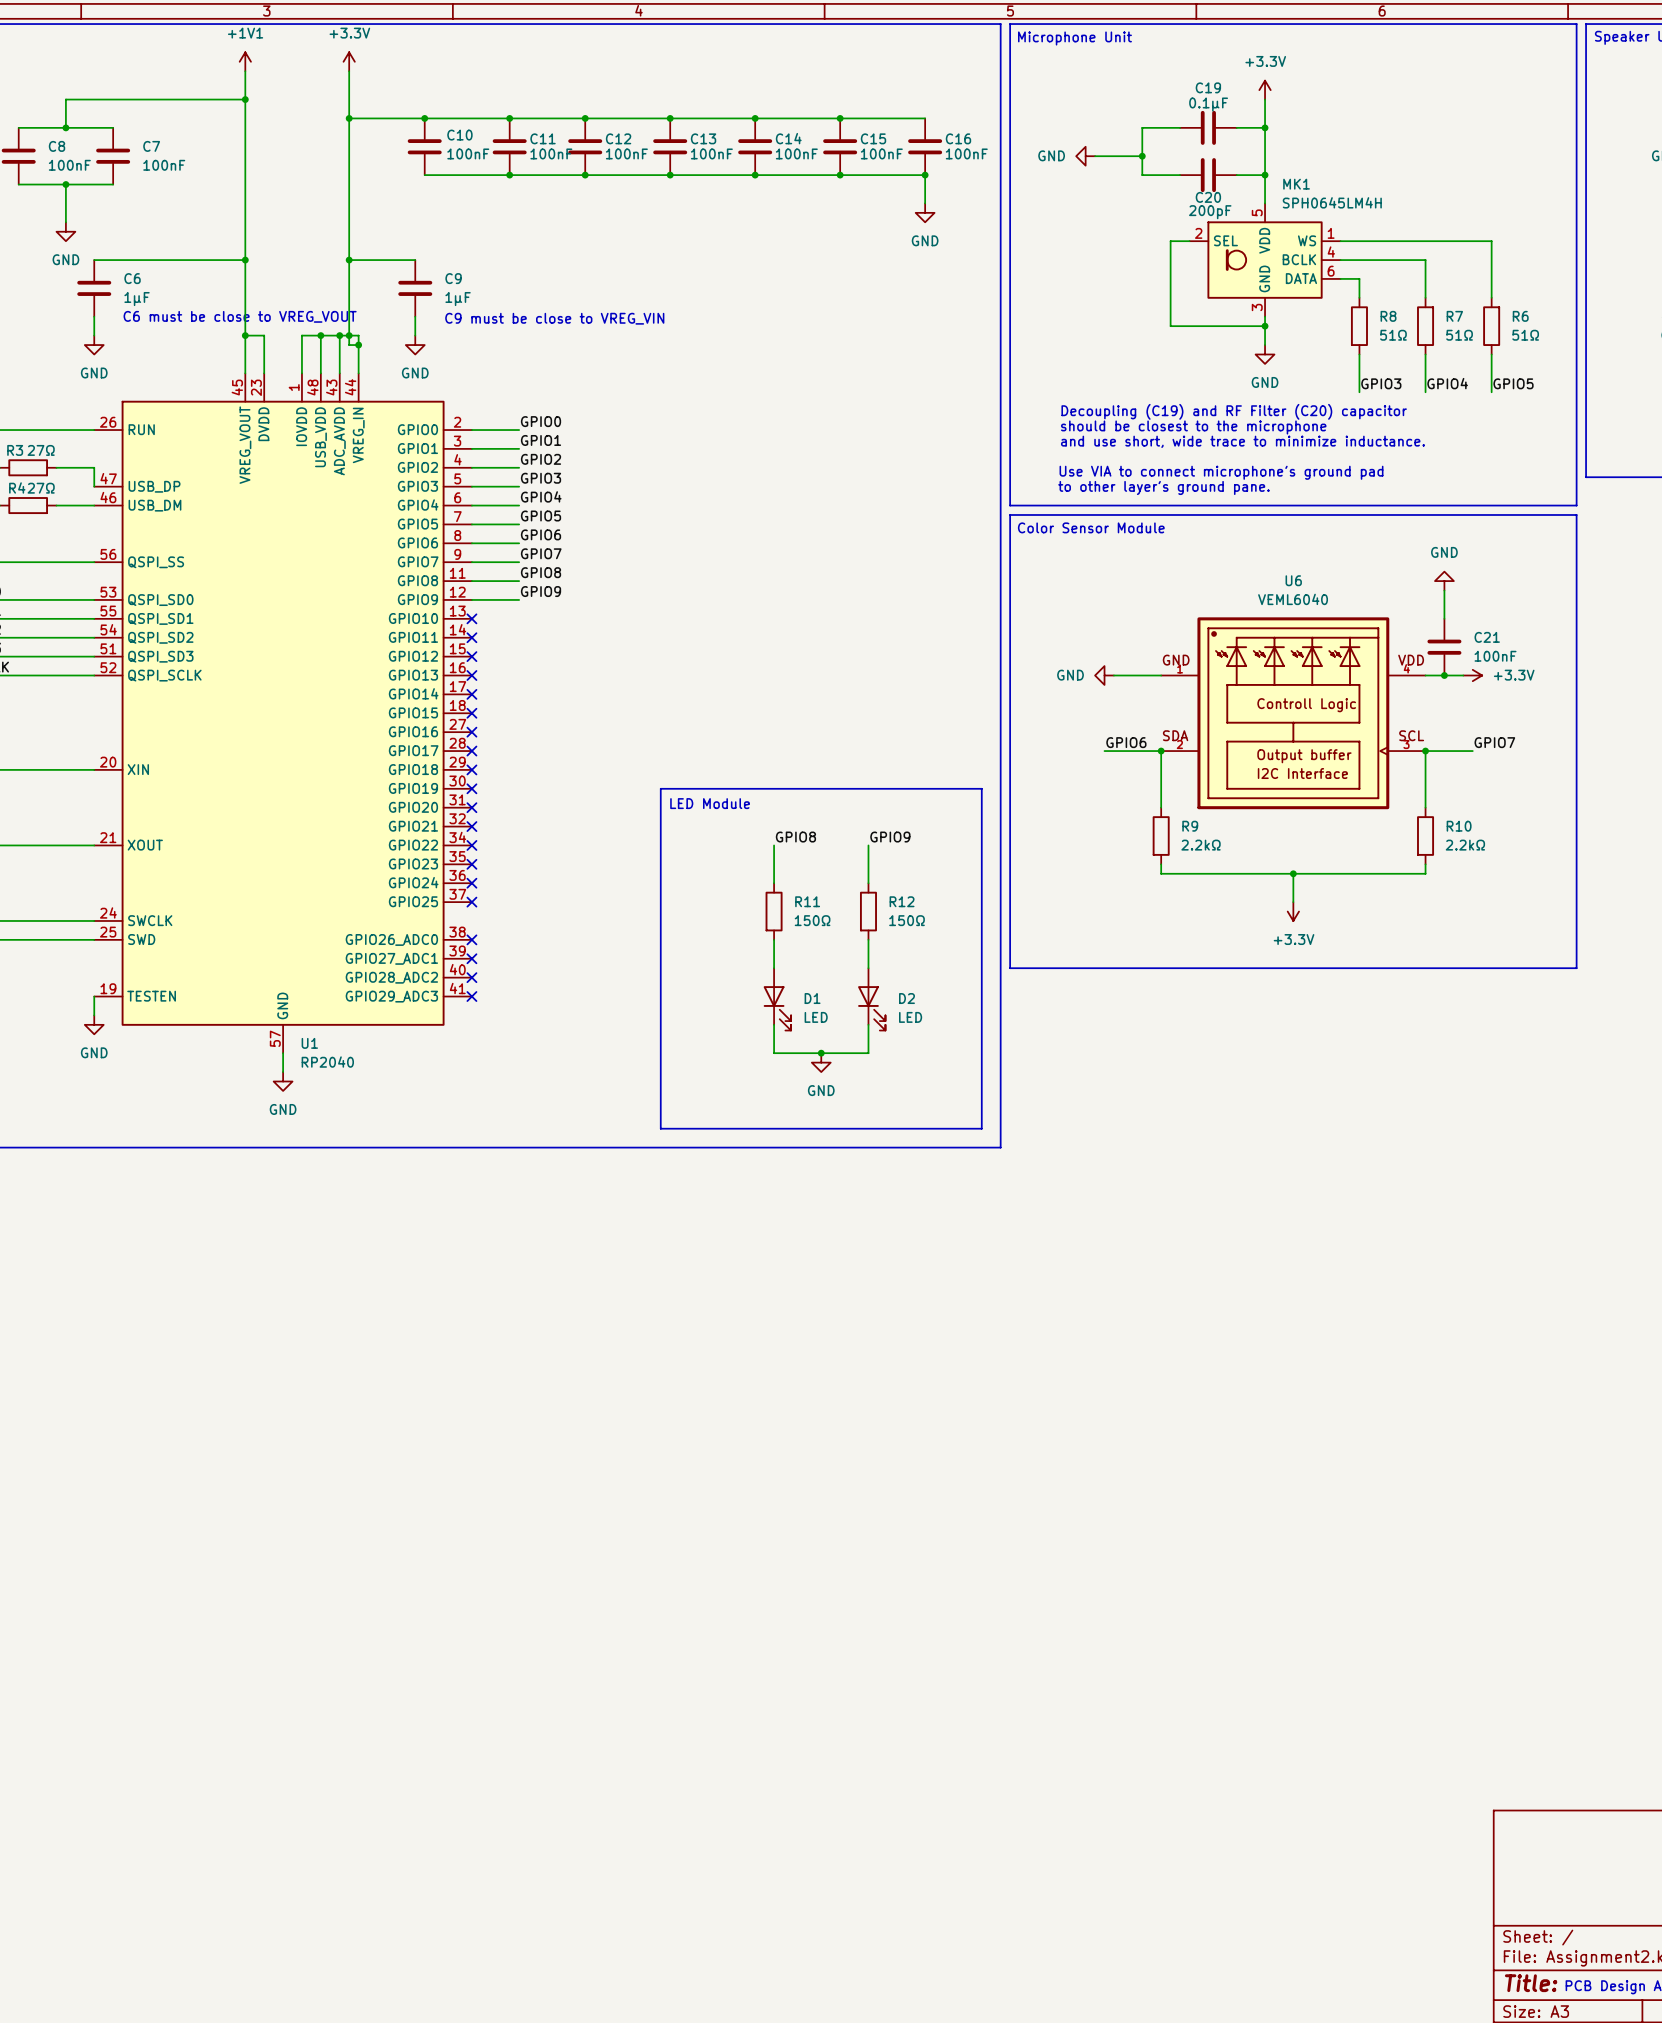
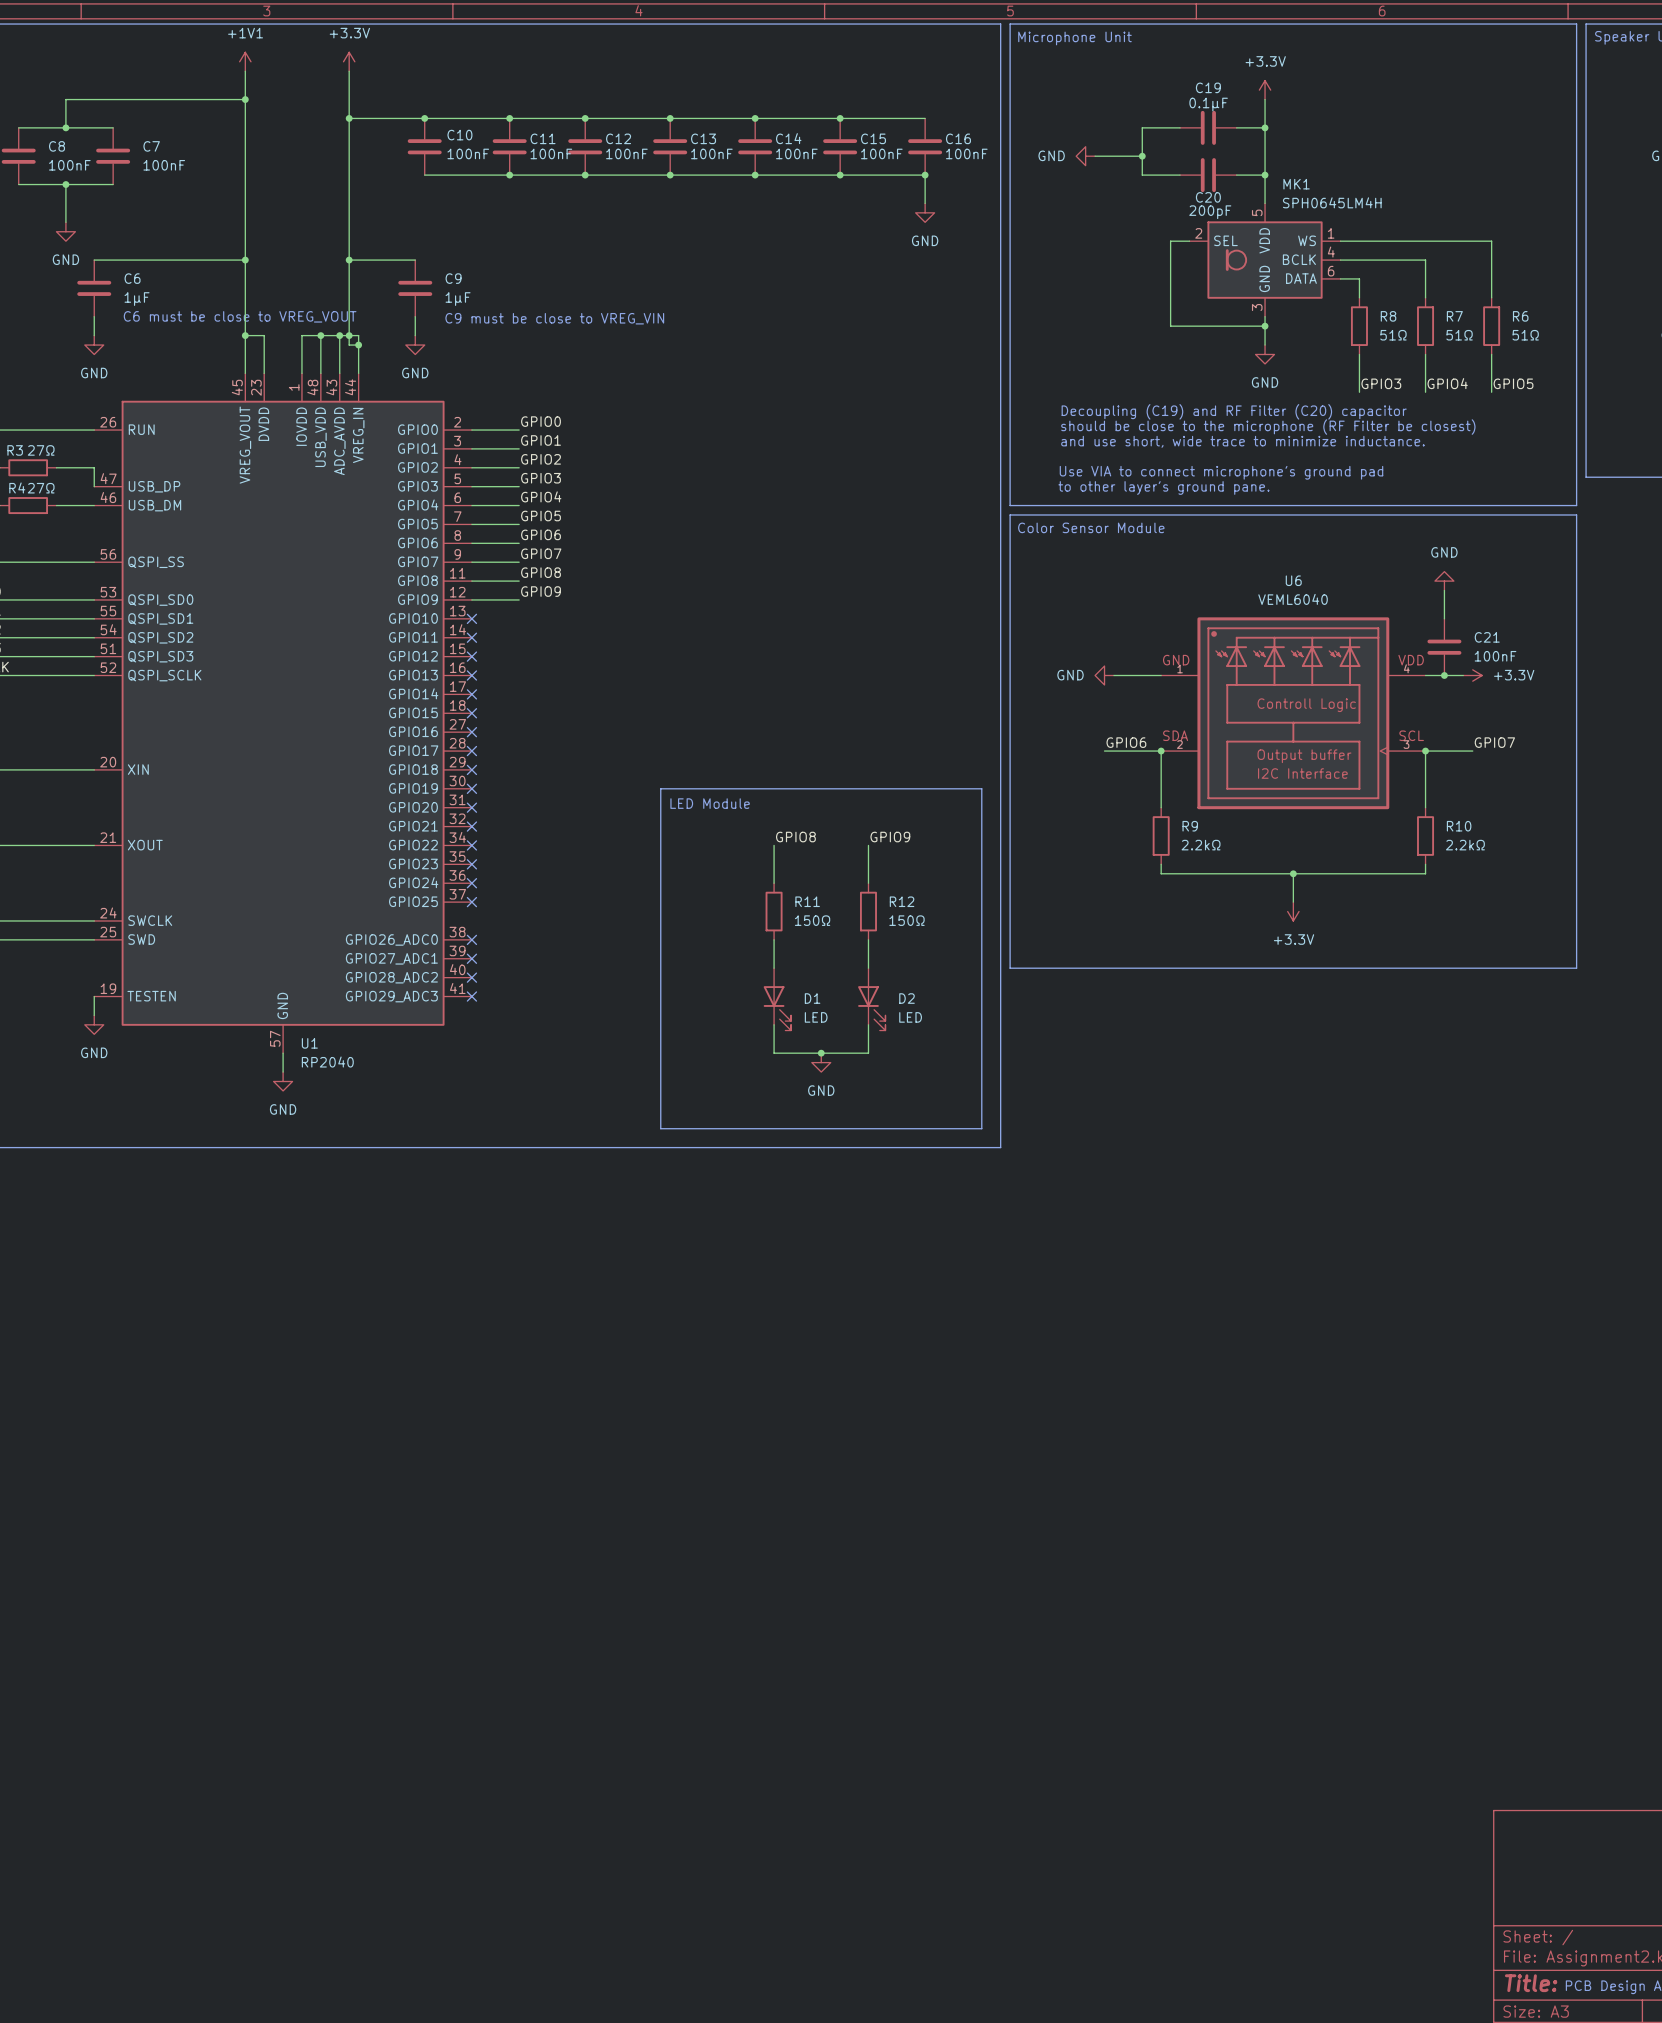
text: should be closest to the microphone (1193, 427) -> should be close to the microphone (RF Filter be closest) (1268, 427)

